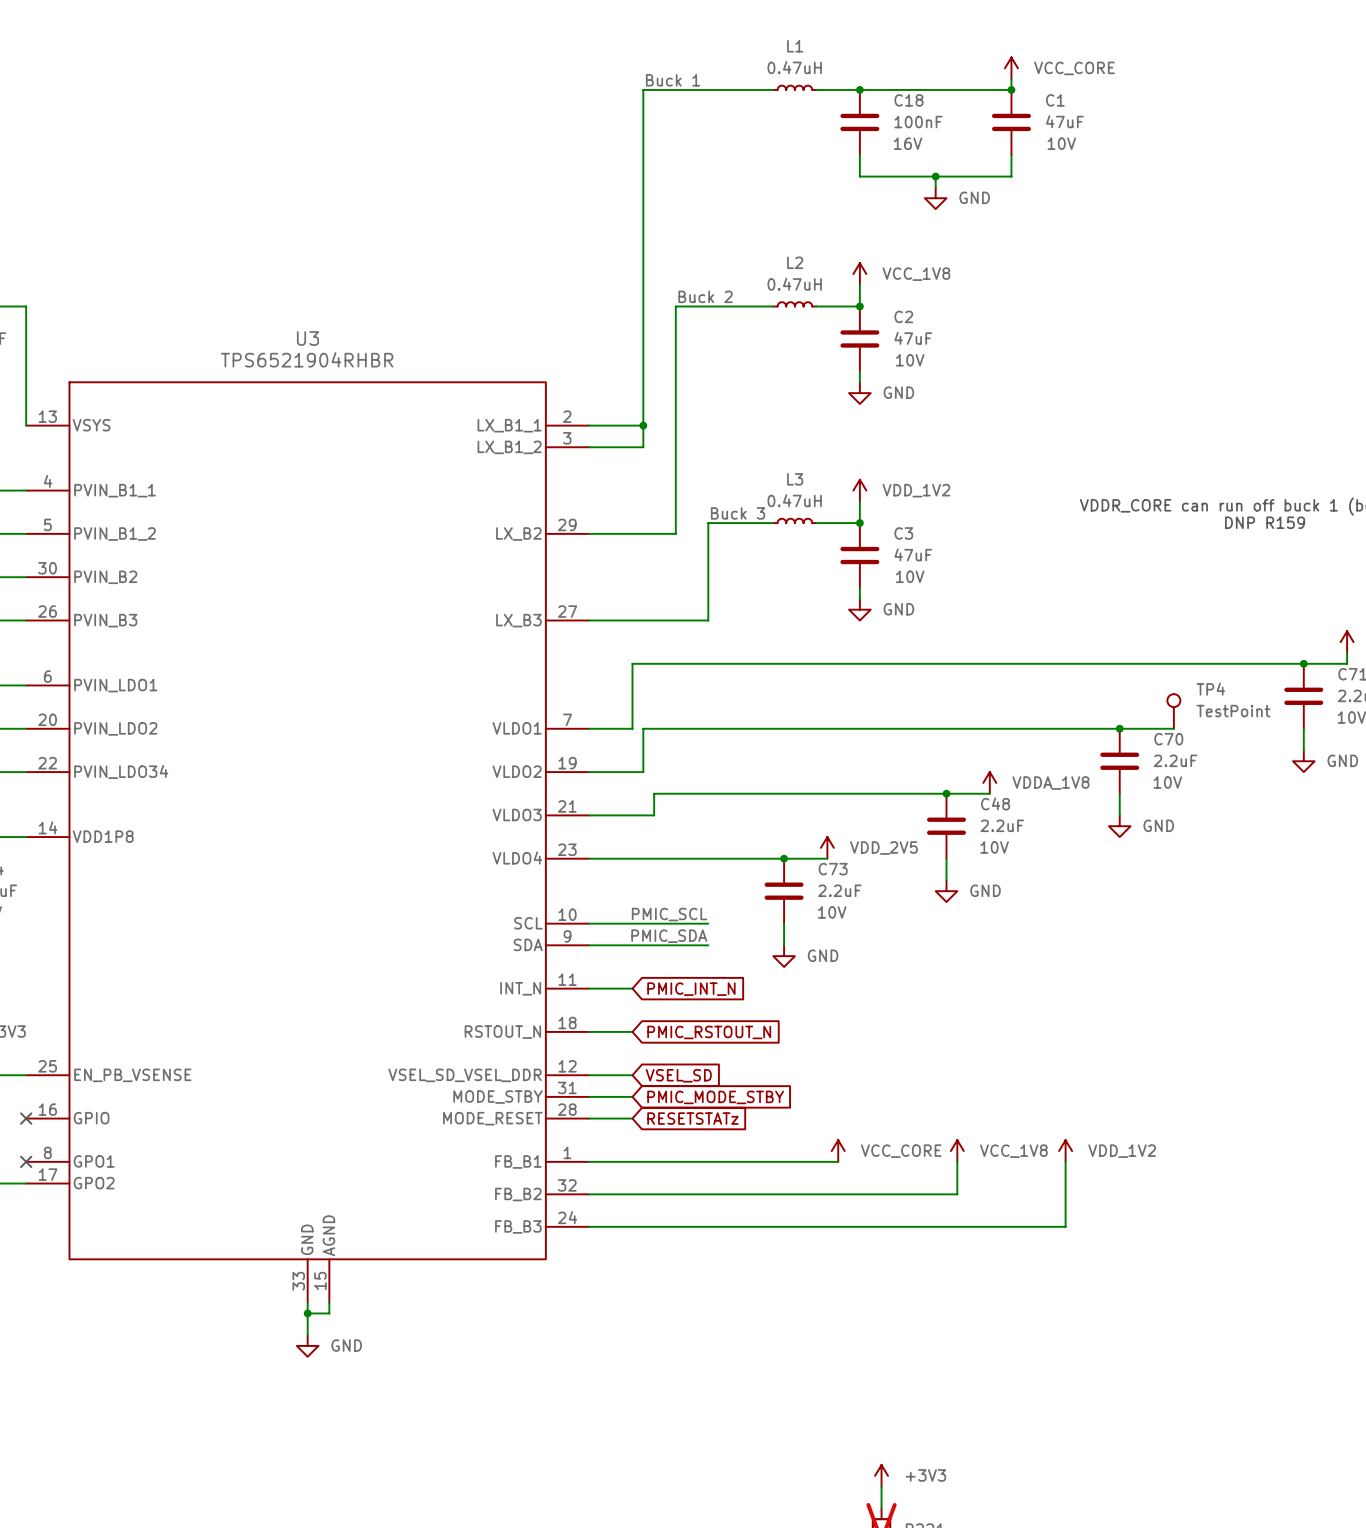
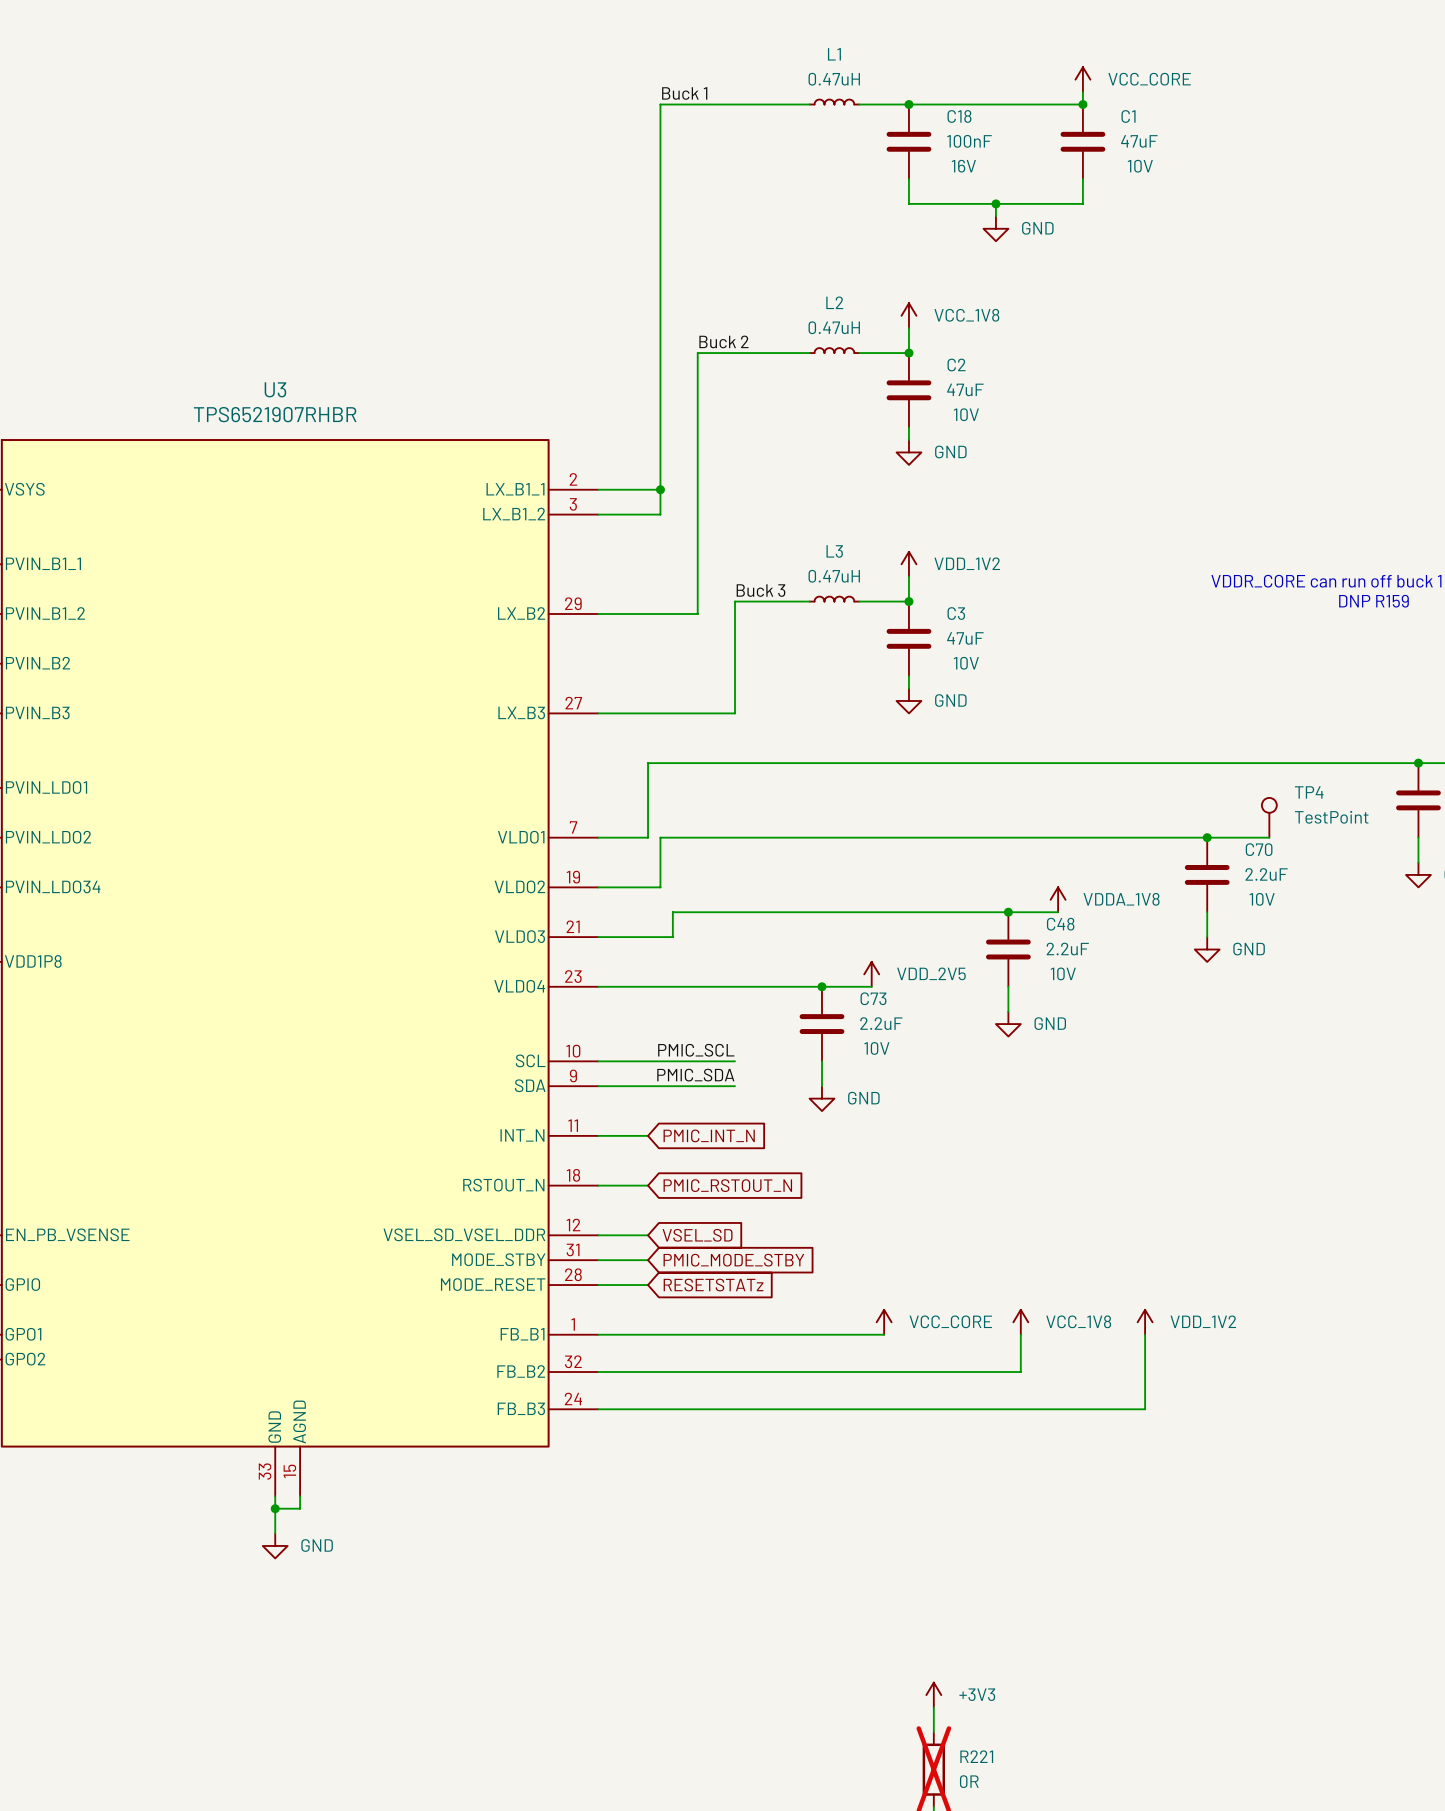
U3 value: TPS6521904RHBR (307, 359) -> TPS6521907RHBR (275, 414)

